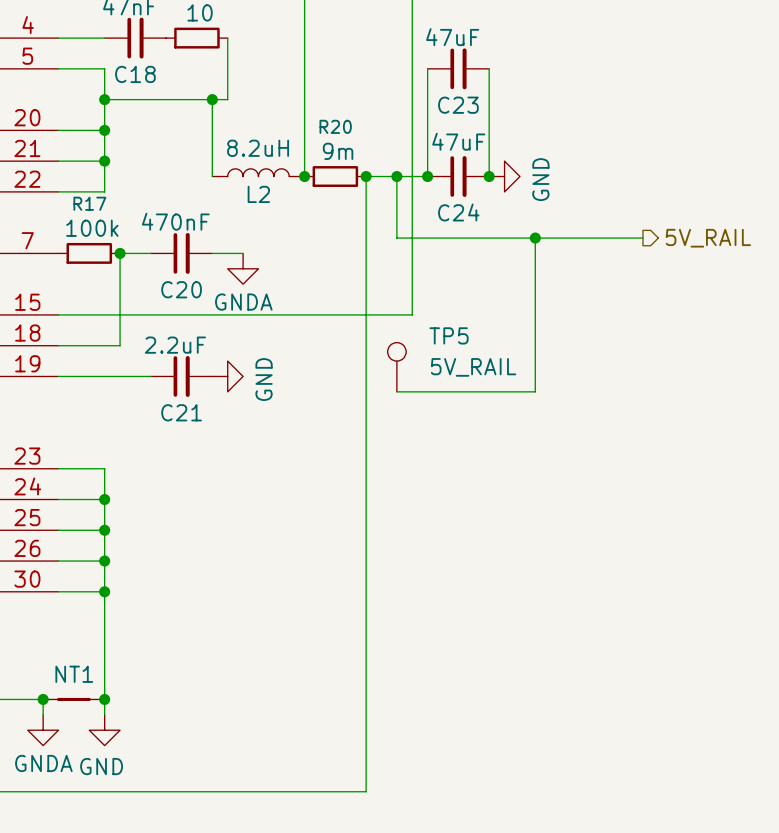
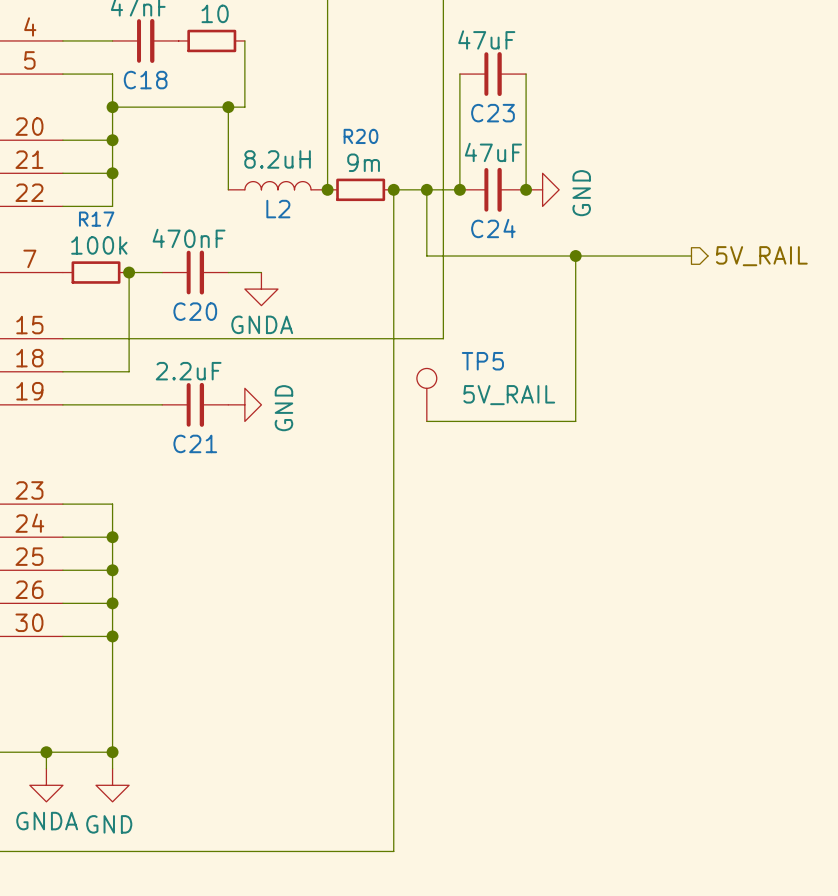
NT1: (73, 699) -> none

